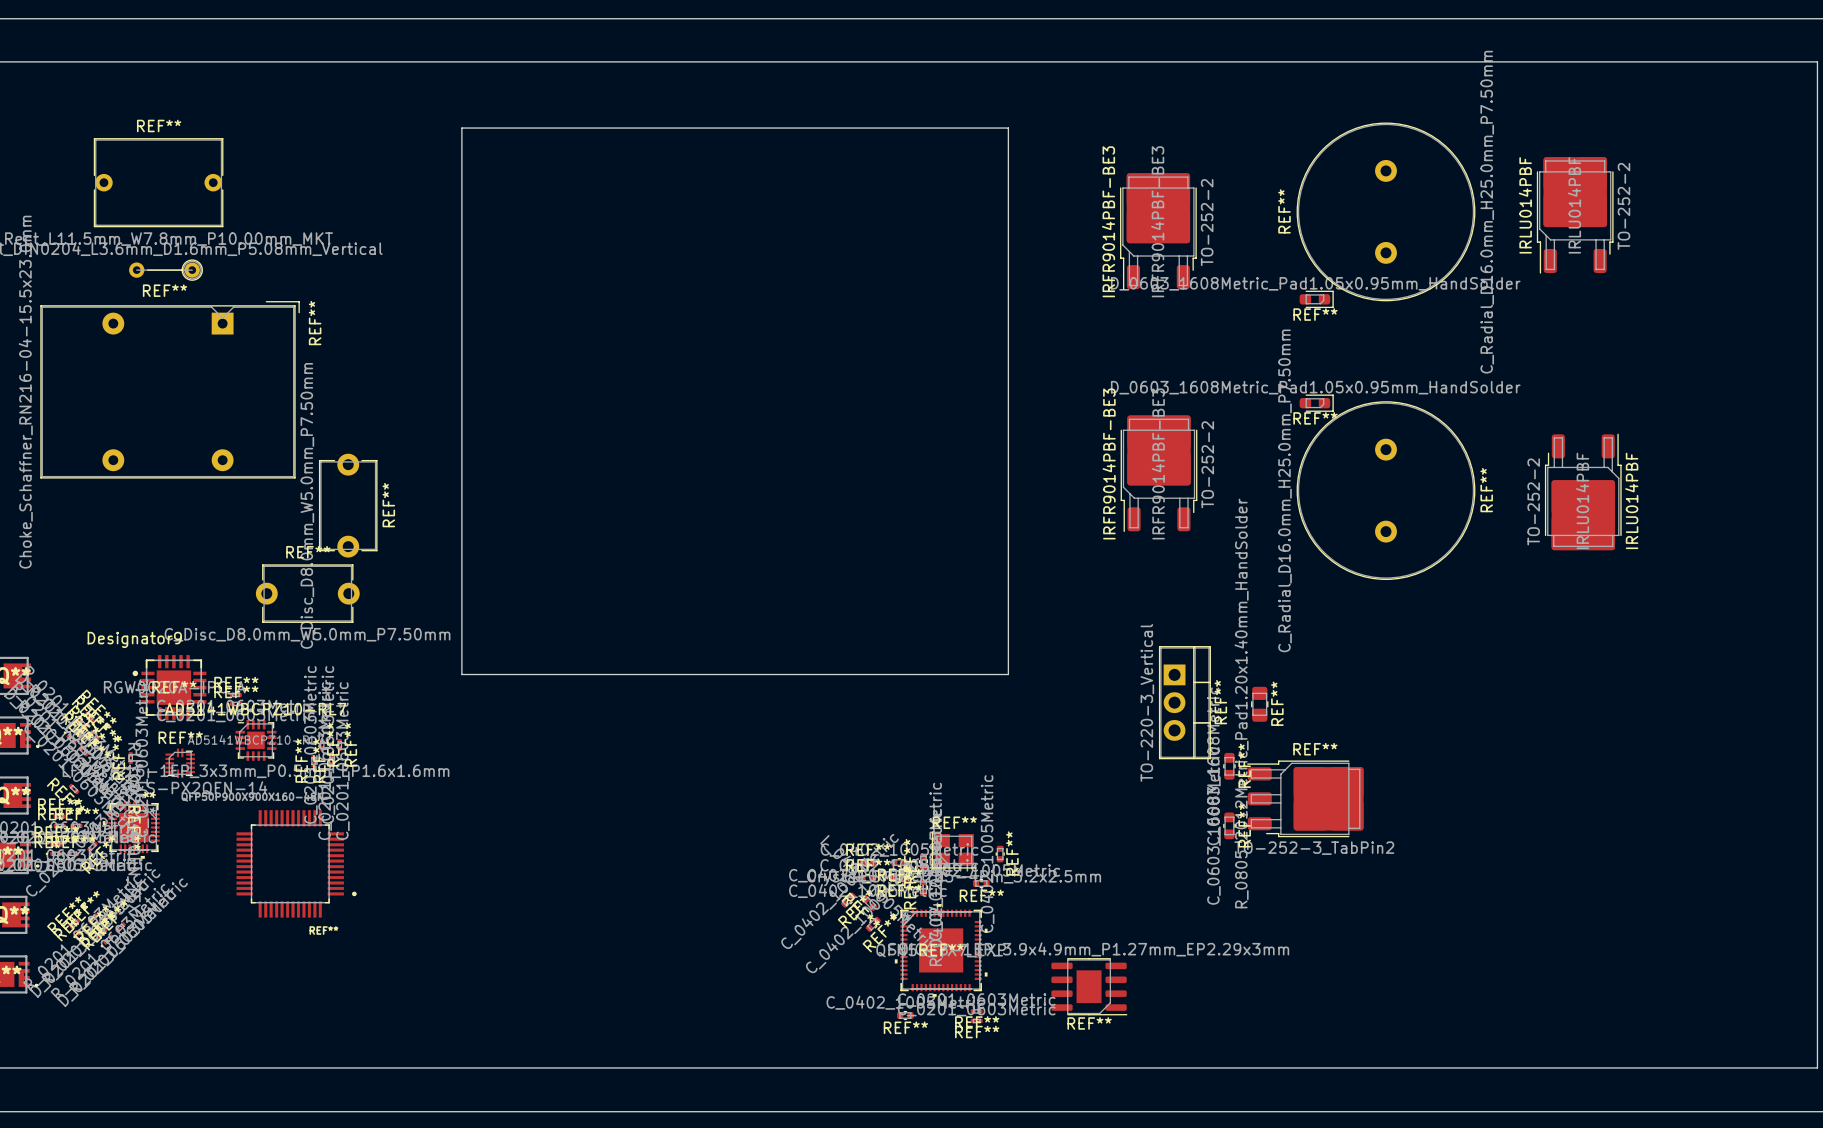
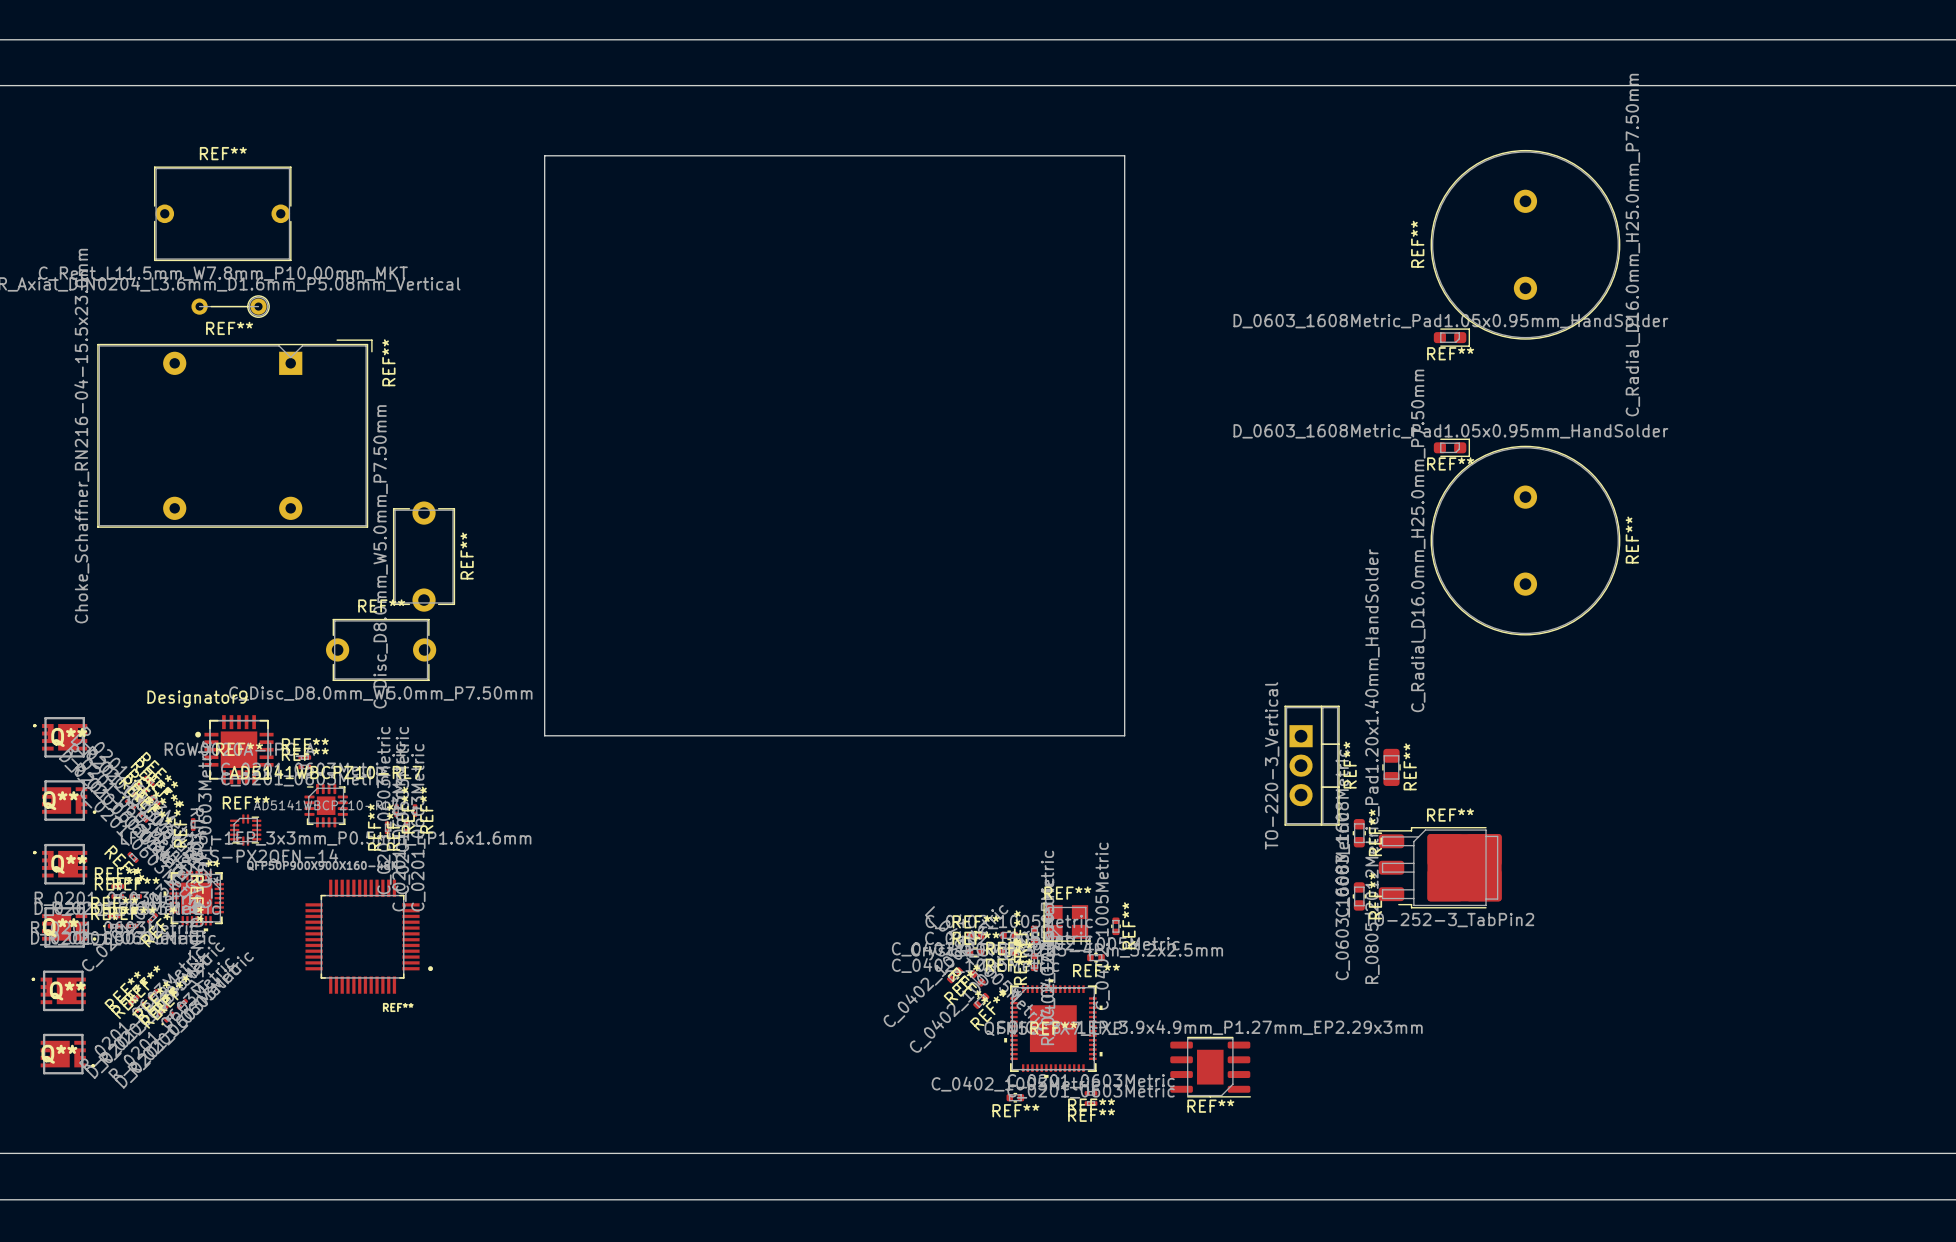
IRLU014PBF: TO-252-2 (1575, 215) -> none
IRFR9014PBF-BE3: TO-252-2 (1158, 231) -> none
IRFR9014PBF-BE3: TO-252-2 (1158, 473) -> none
IRLU014PBF: TO-252-2 (1583, 491) -> none

